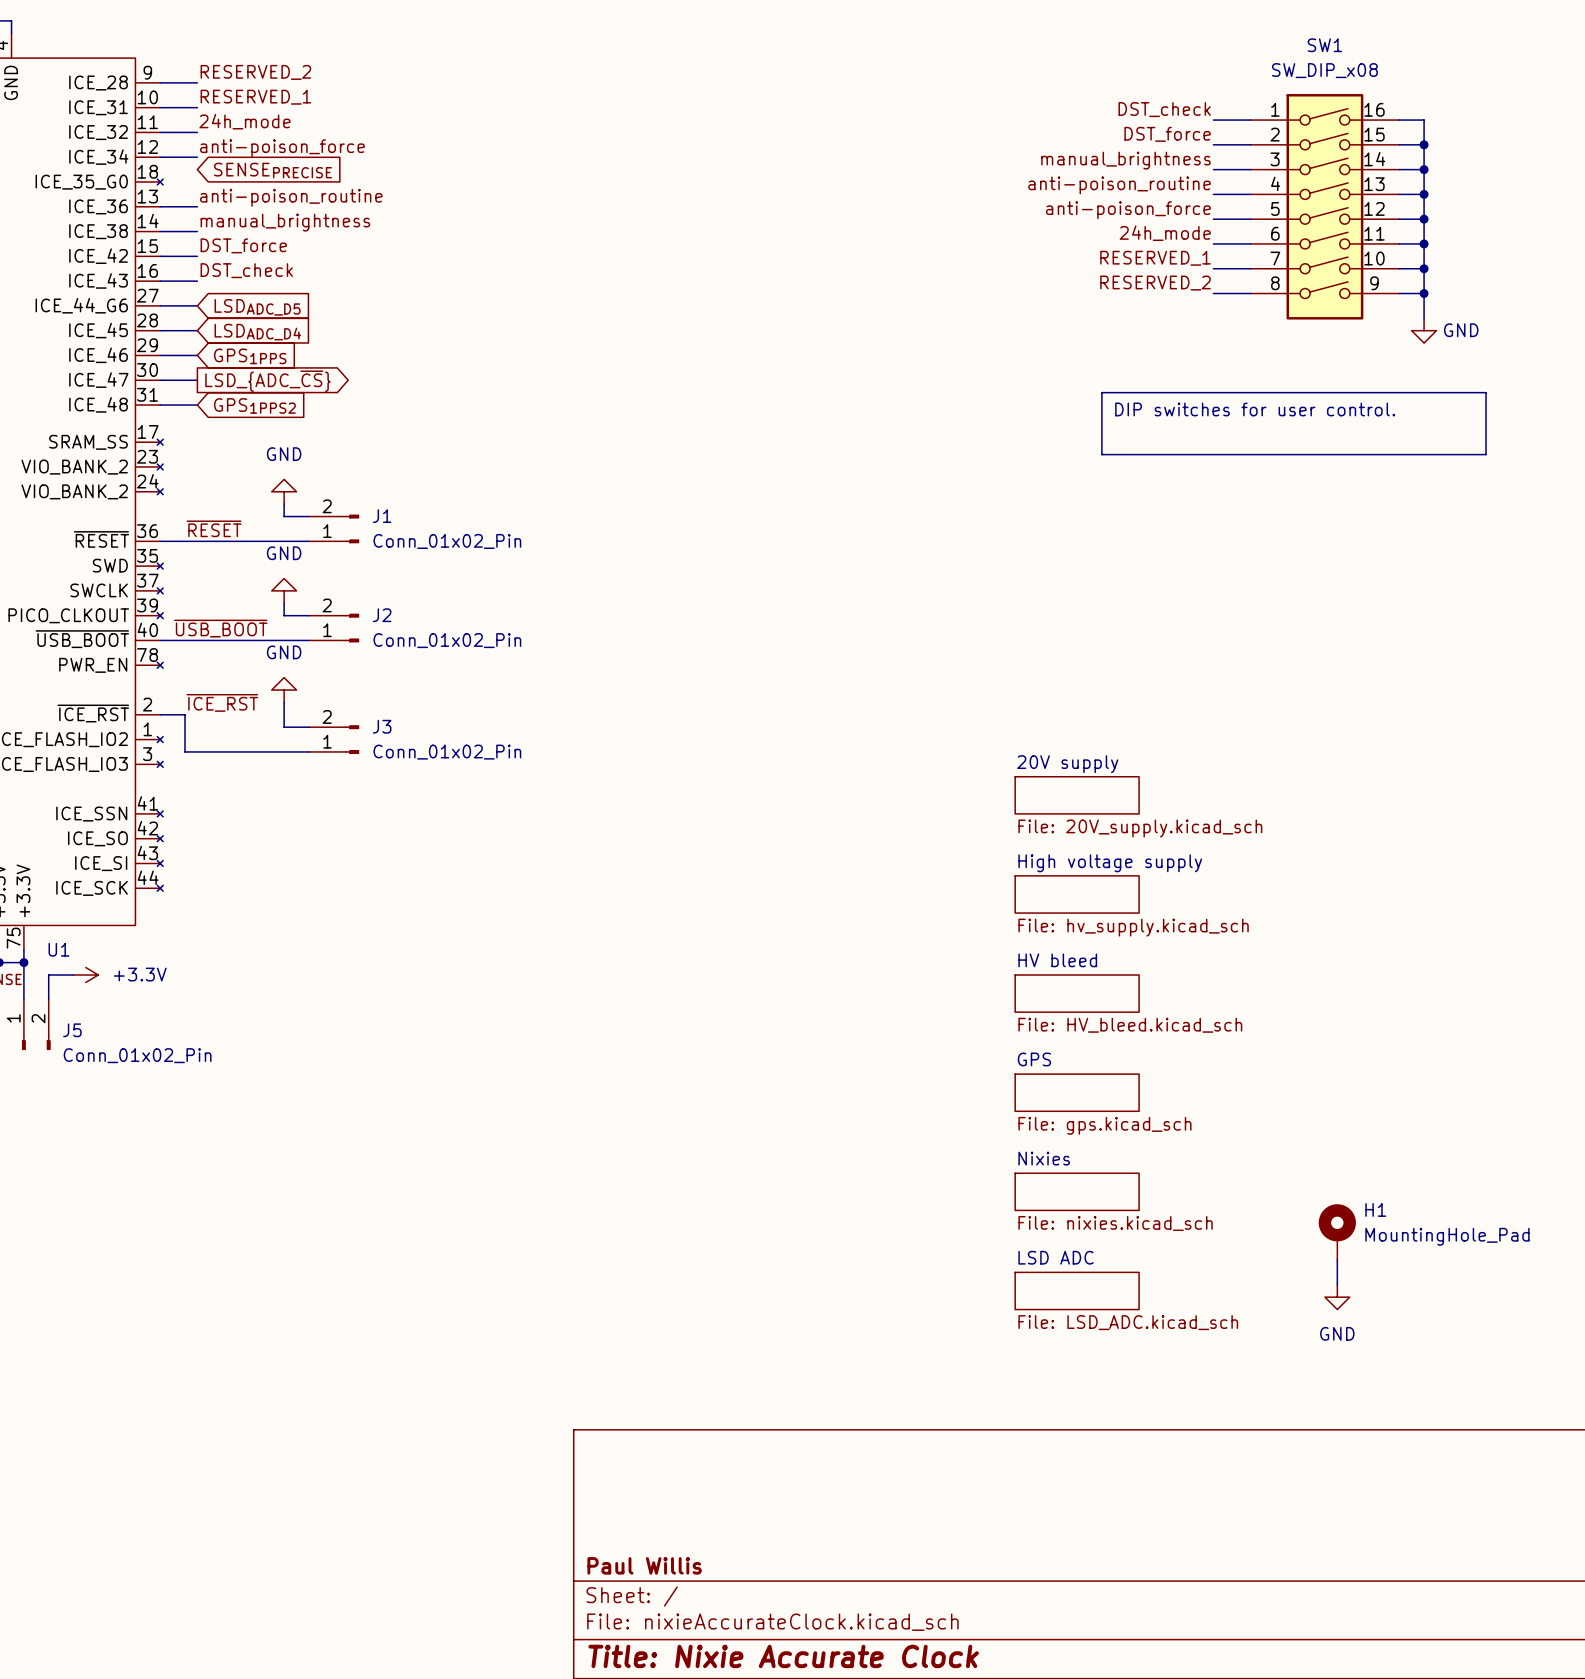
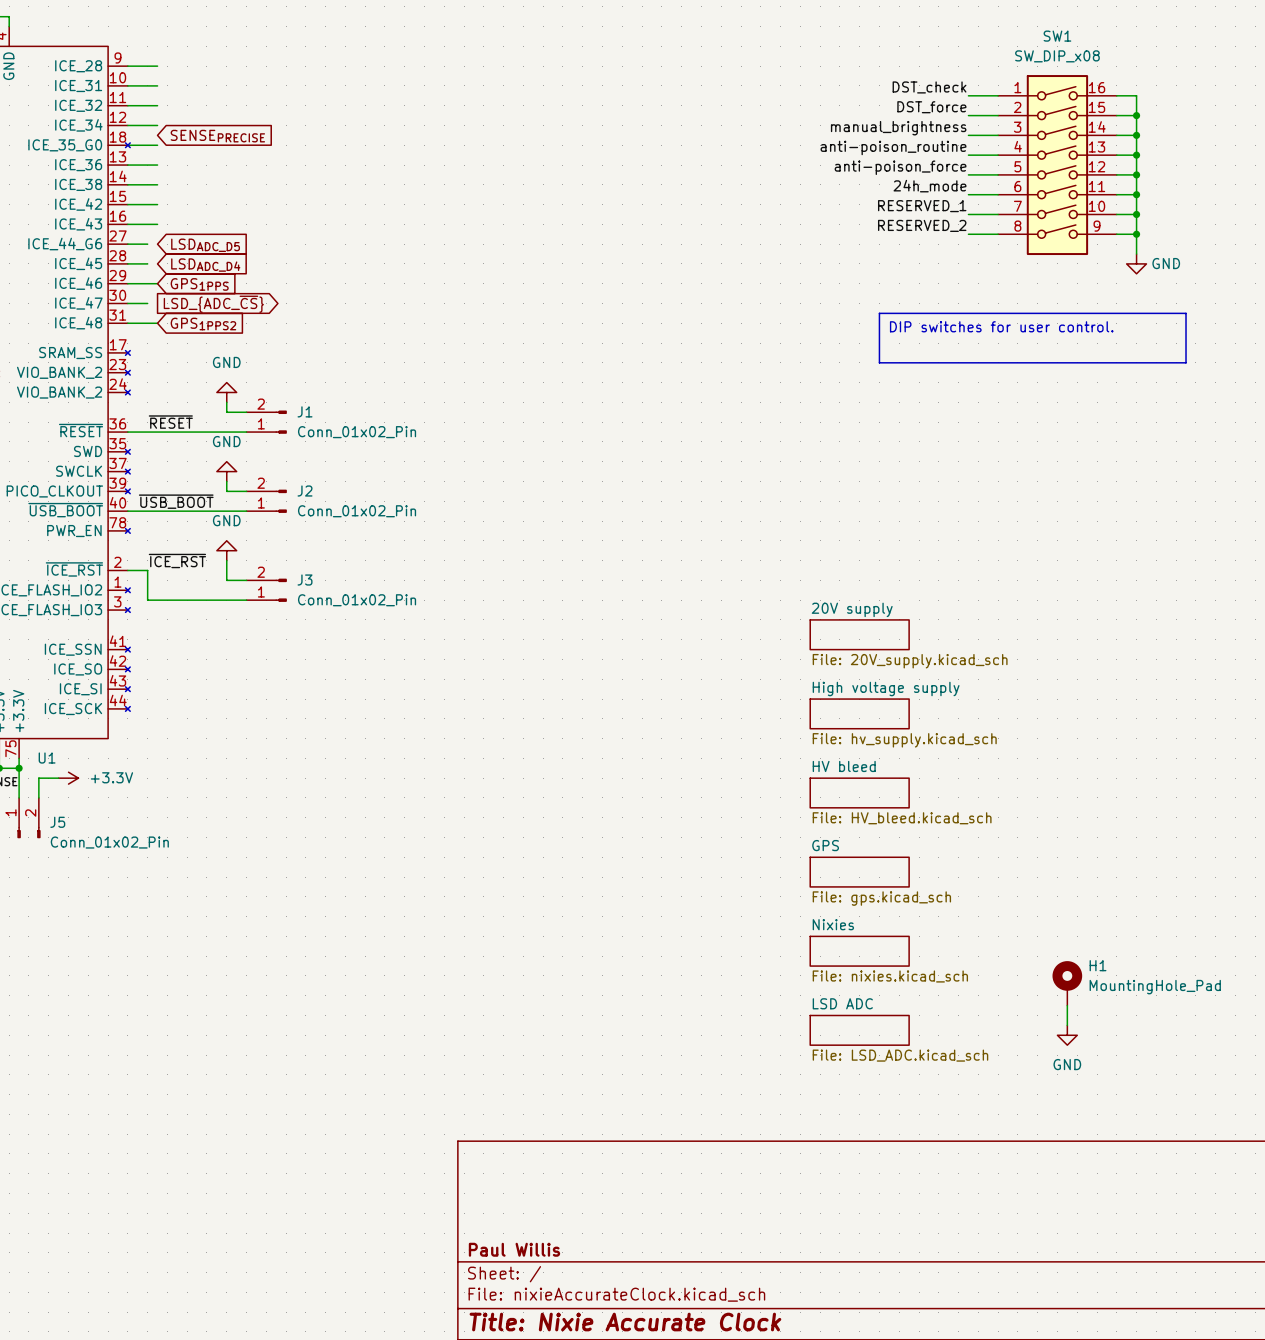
label: RESERVED_2 (255, 72) -> none
label: RESERVED_1 (255, 97) -> none
label: 24h_mode (244, 121) -> none
label: anti-poison_force (282, 148) -> none
wire: none -> (127, 145) (157, 145)
label: anti-poison_routine (291, 197) -> none
label: manual_brightness (285, 222) -> none
label: DST_force (243, 245) -> none
label: DST_check (246, 270) -> none
wire: (185, 305) (197, 305) -> none
wire: (185, 330) (197, 330) -> none
wire: (185, 380) (197, 380) -> none

